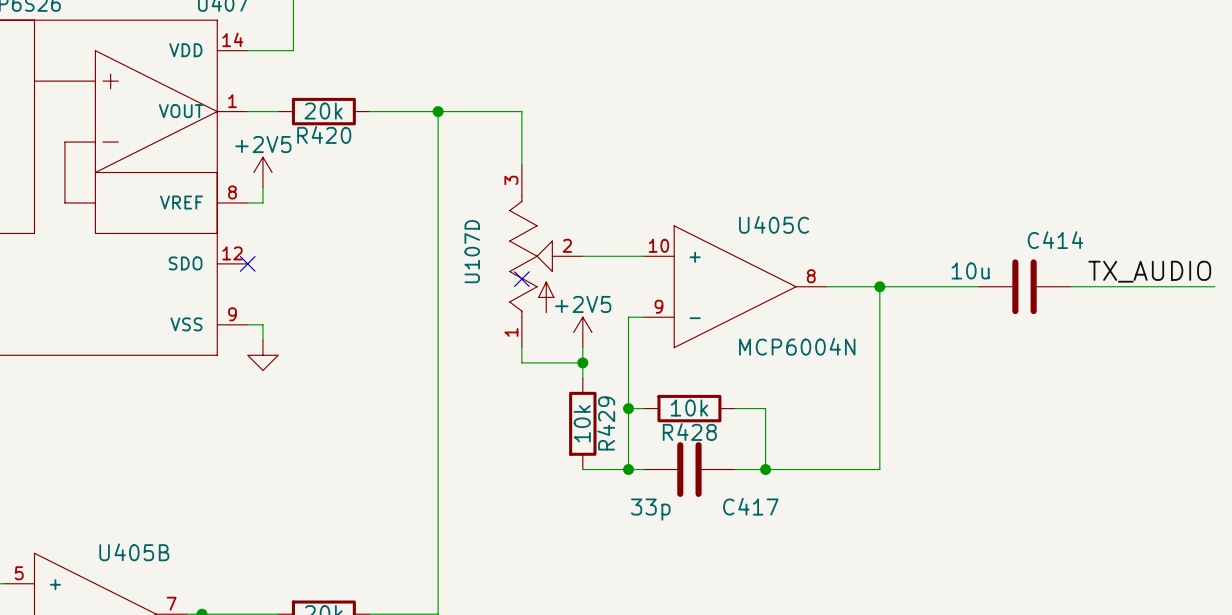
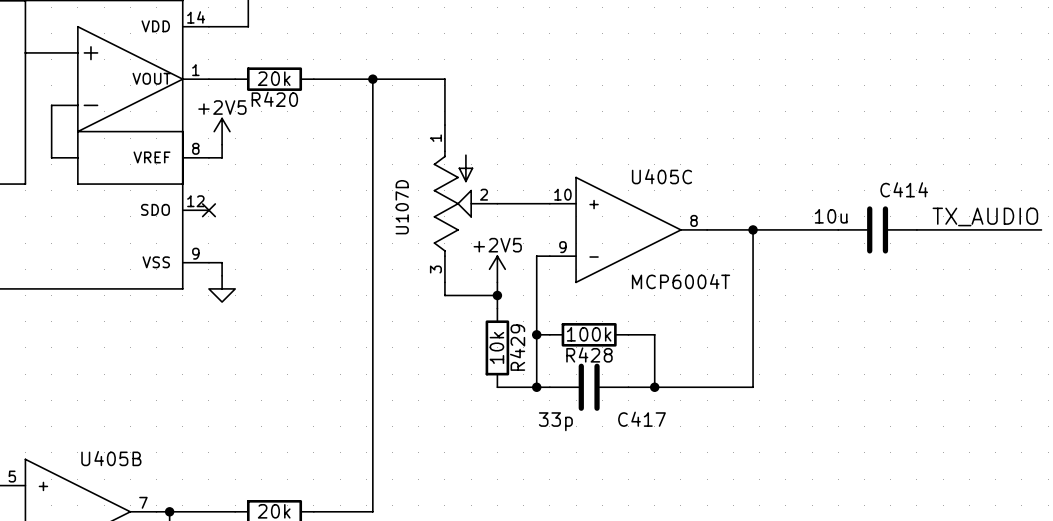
U107D flip: as is (531, 256) -> up-down (453, 203)
no-connect mark: (521, 279) -> none
U405C value: MCP6004N (797, 346) -> MCP6004T (681, 281)
R428 value: 10k (689, 408) -> 100k (589, 334)

